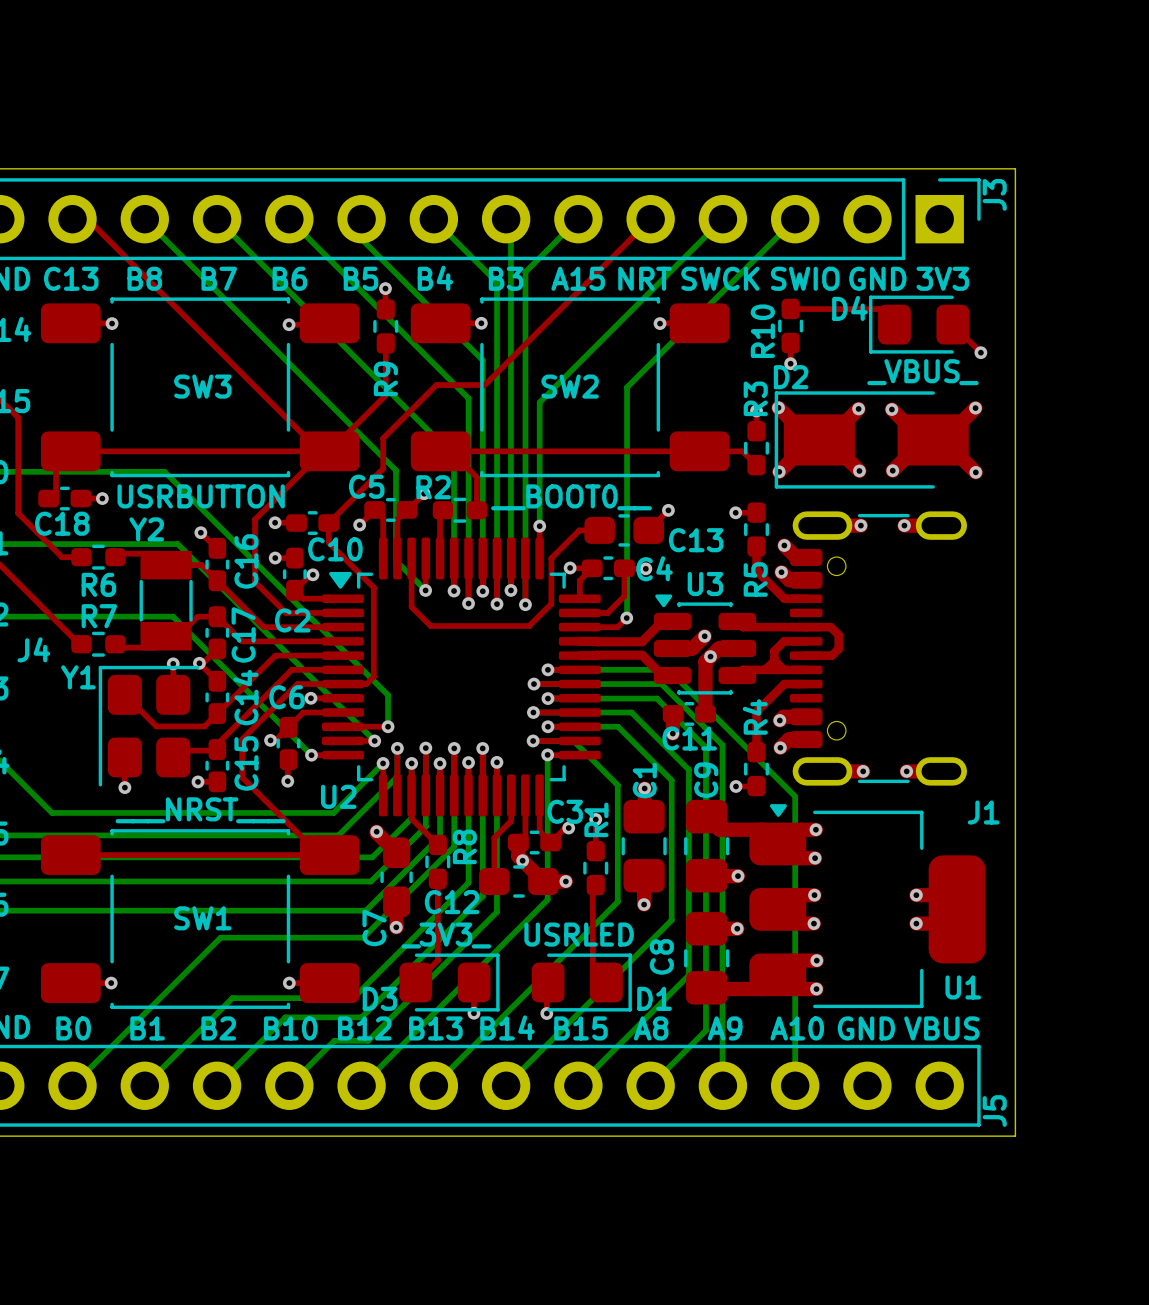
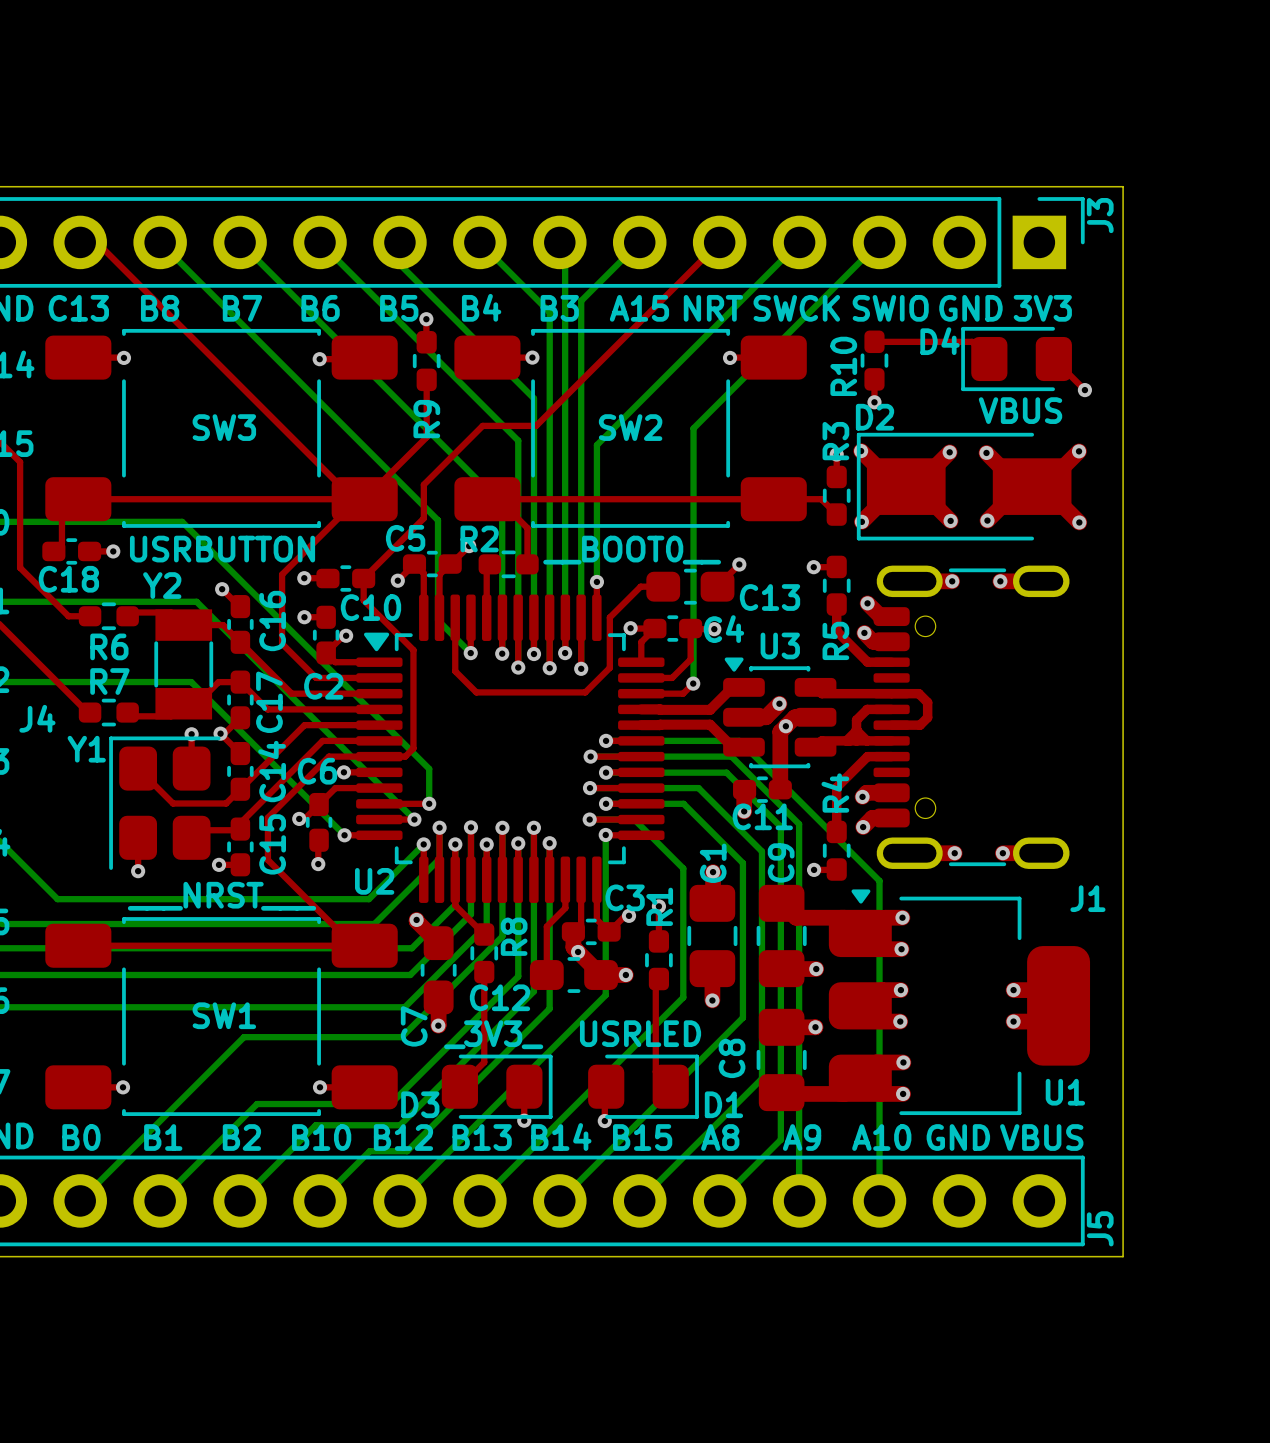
text: _VBUS_ (922, 372) -> VBUS (1020, 410)

